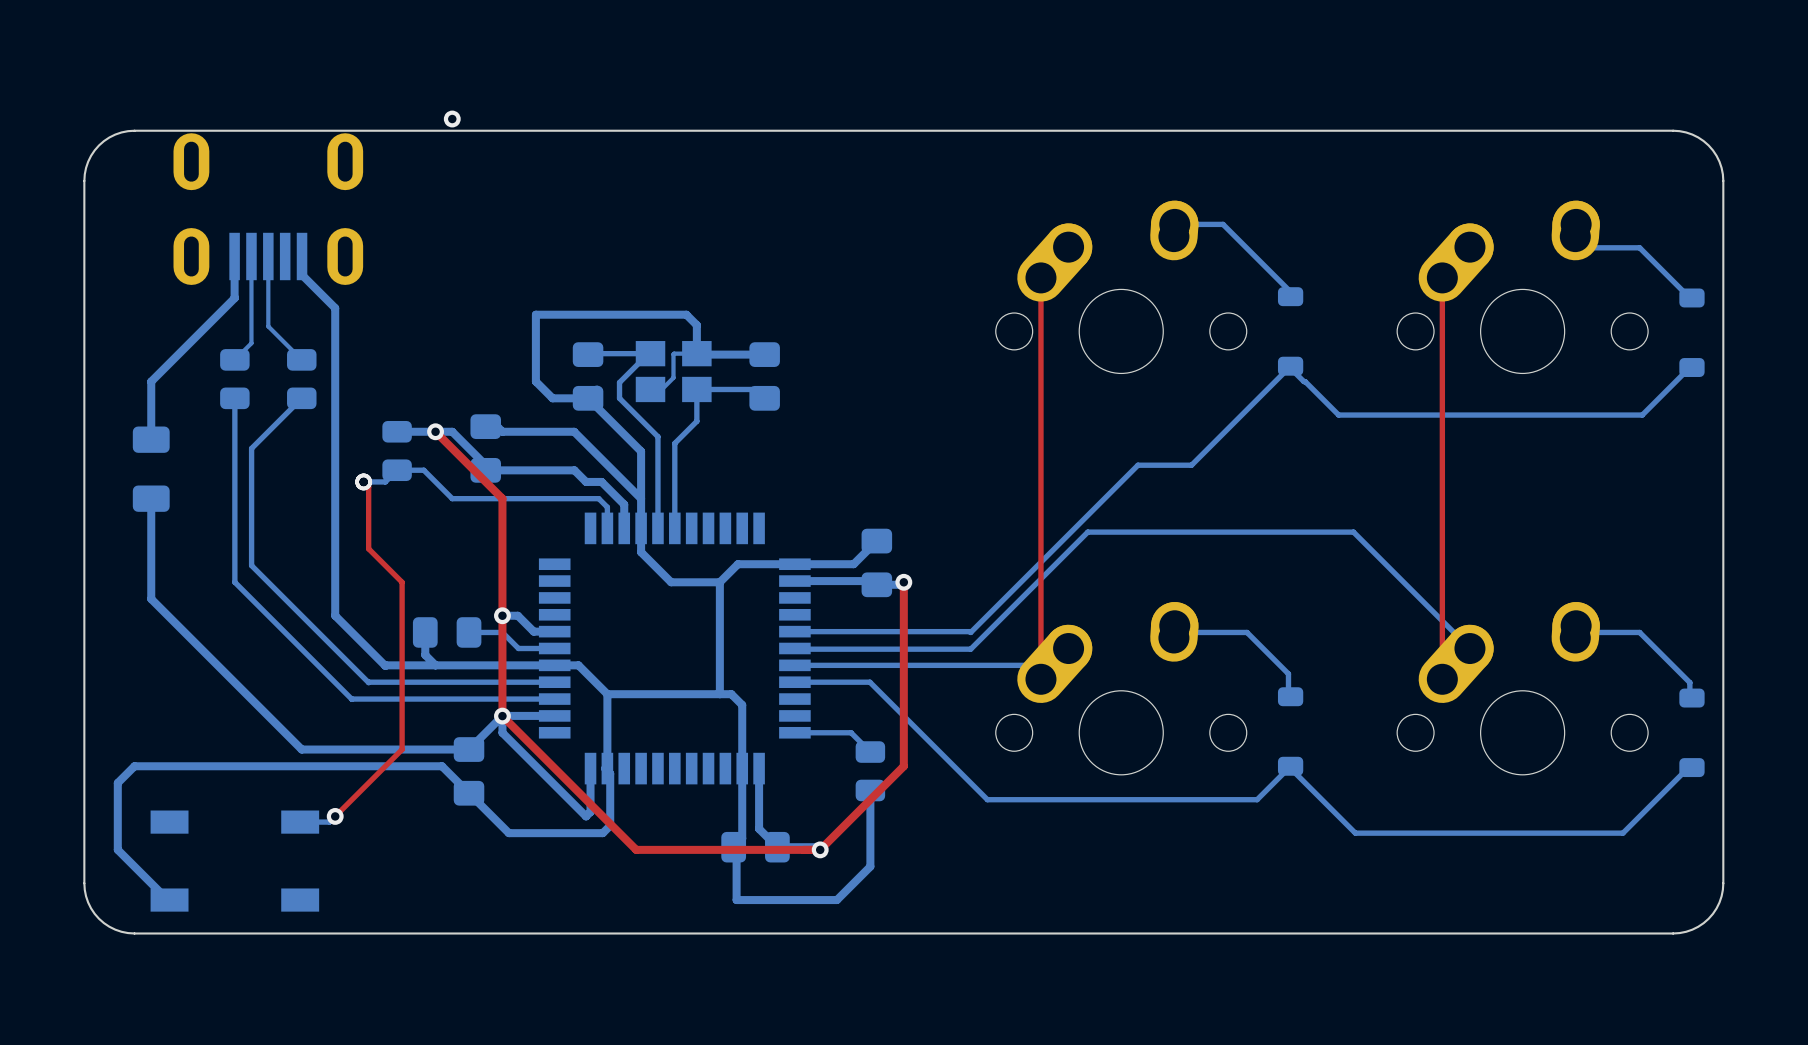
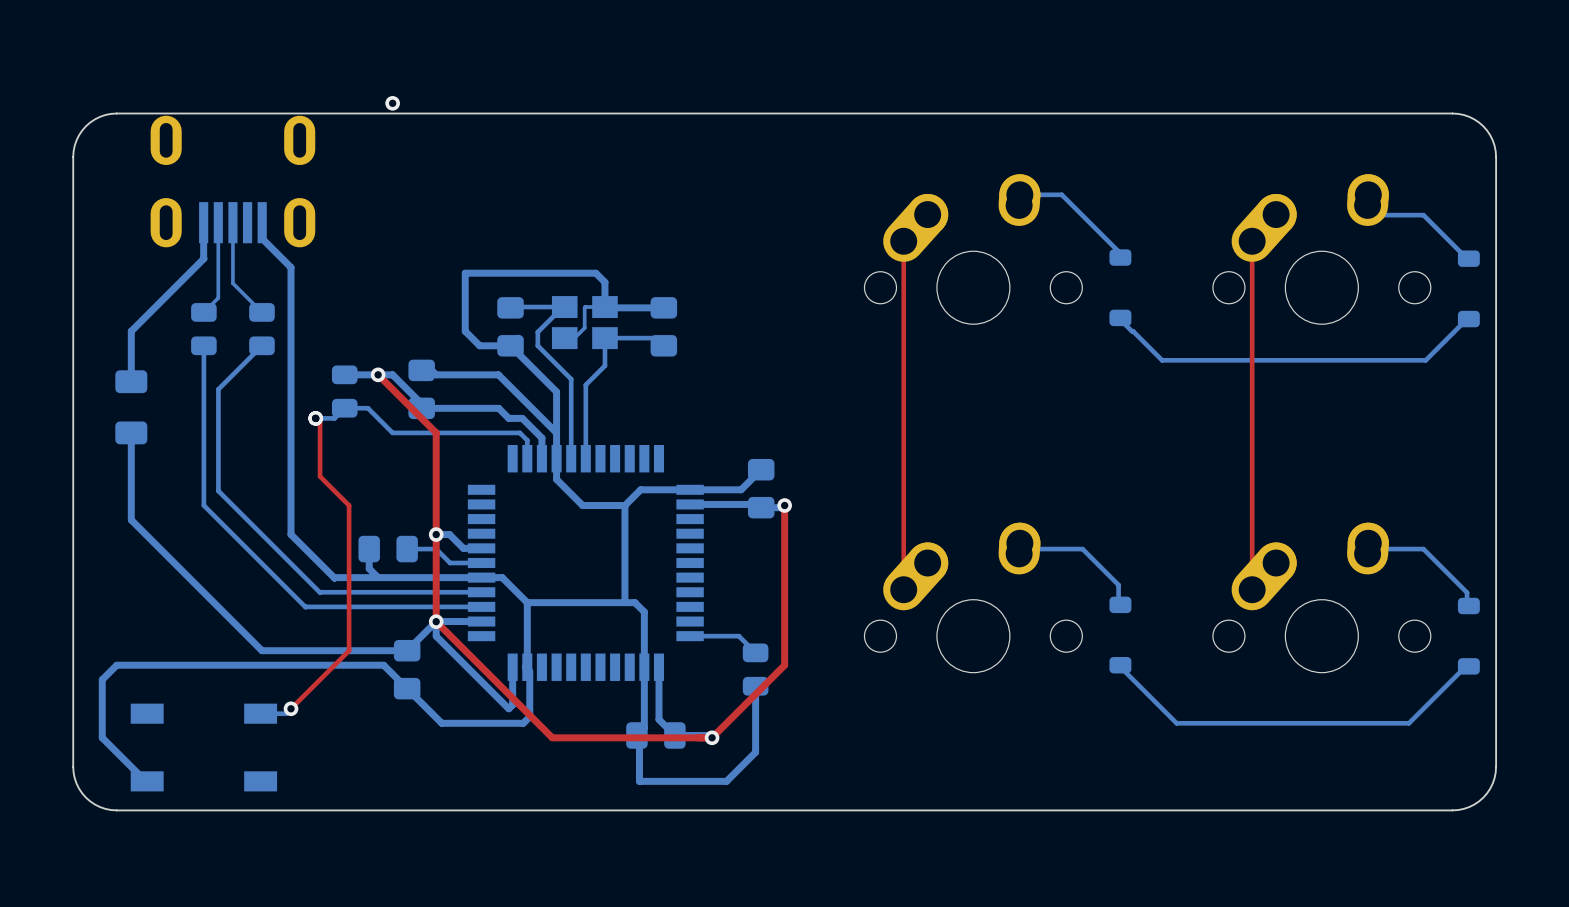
bottom track: (1290, 366) (1191, 465) (1137, 465) (970, 632) (794, 631) -> none
bottom track: (794, 648) (970, 649) (1087, 532) (1353, 532) (1469, 648) -> none
bottom track: (794, 665) (1027, 665) (1040, 679) -> none
bottom track: (794, 682) (869, 682) (987, 799) (1257, 799) (1290, 766) -> none

